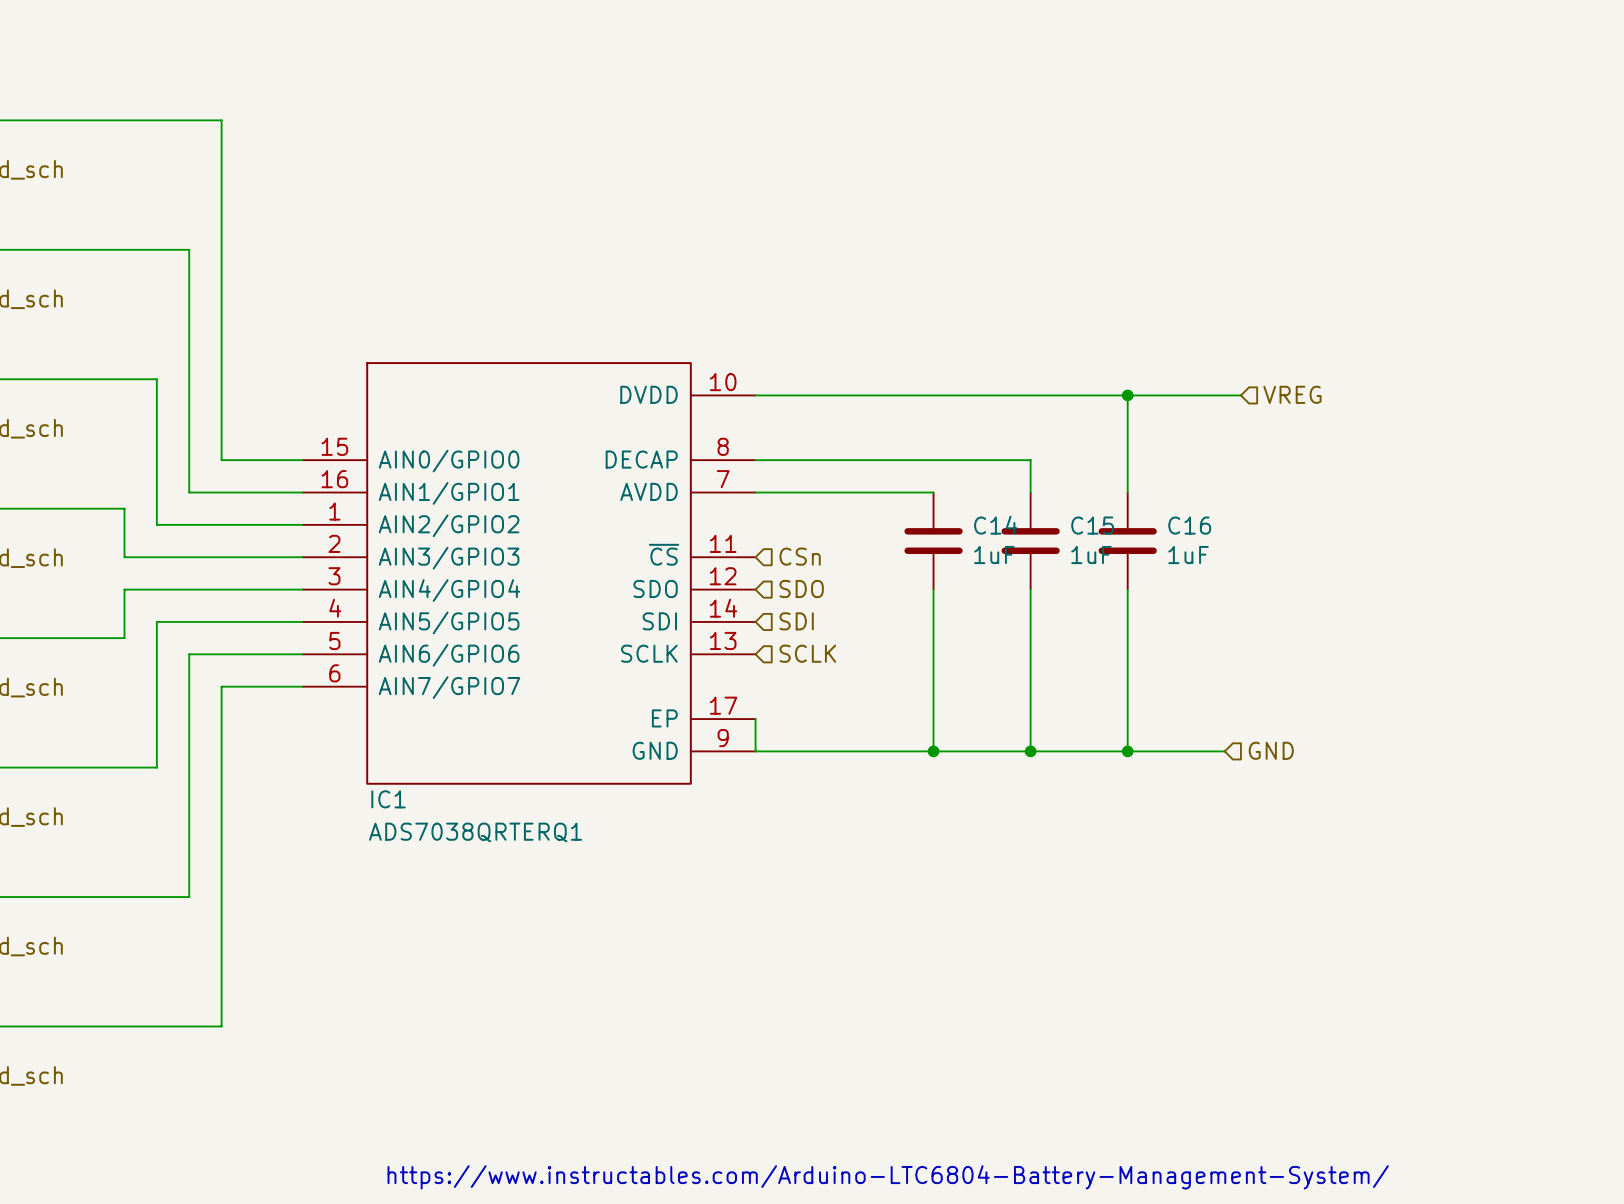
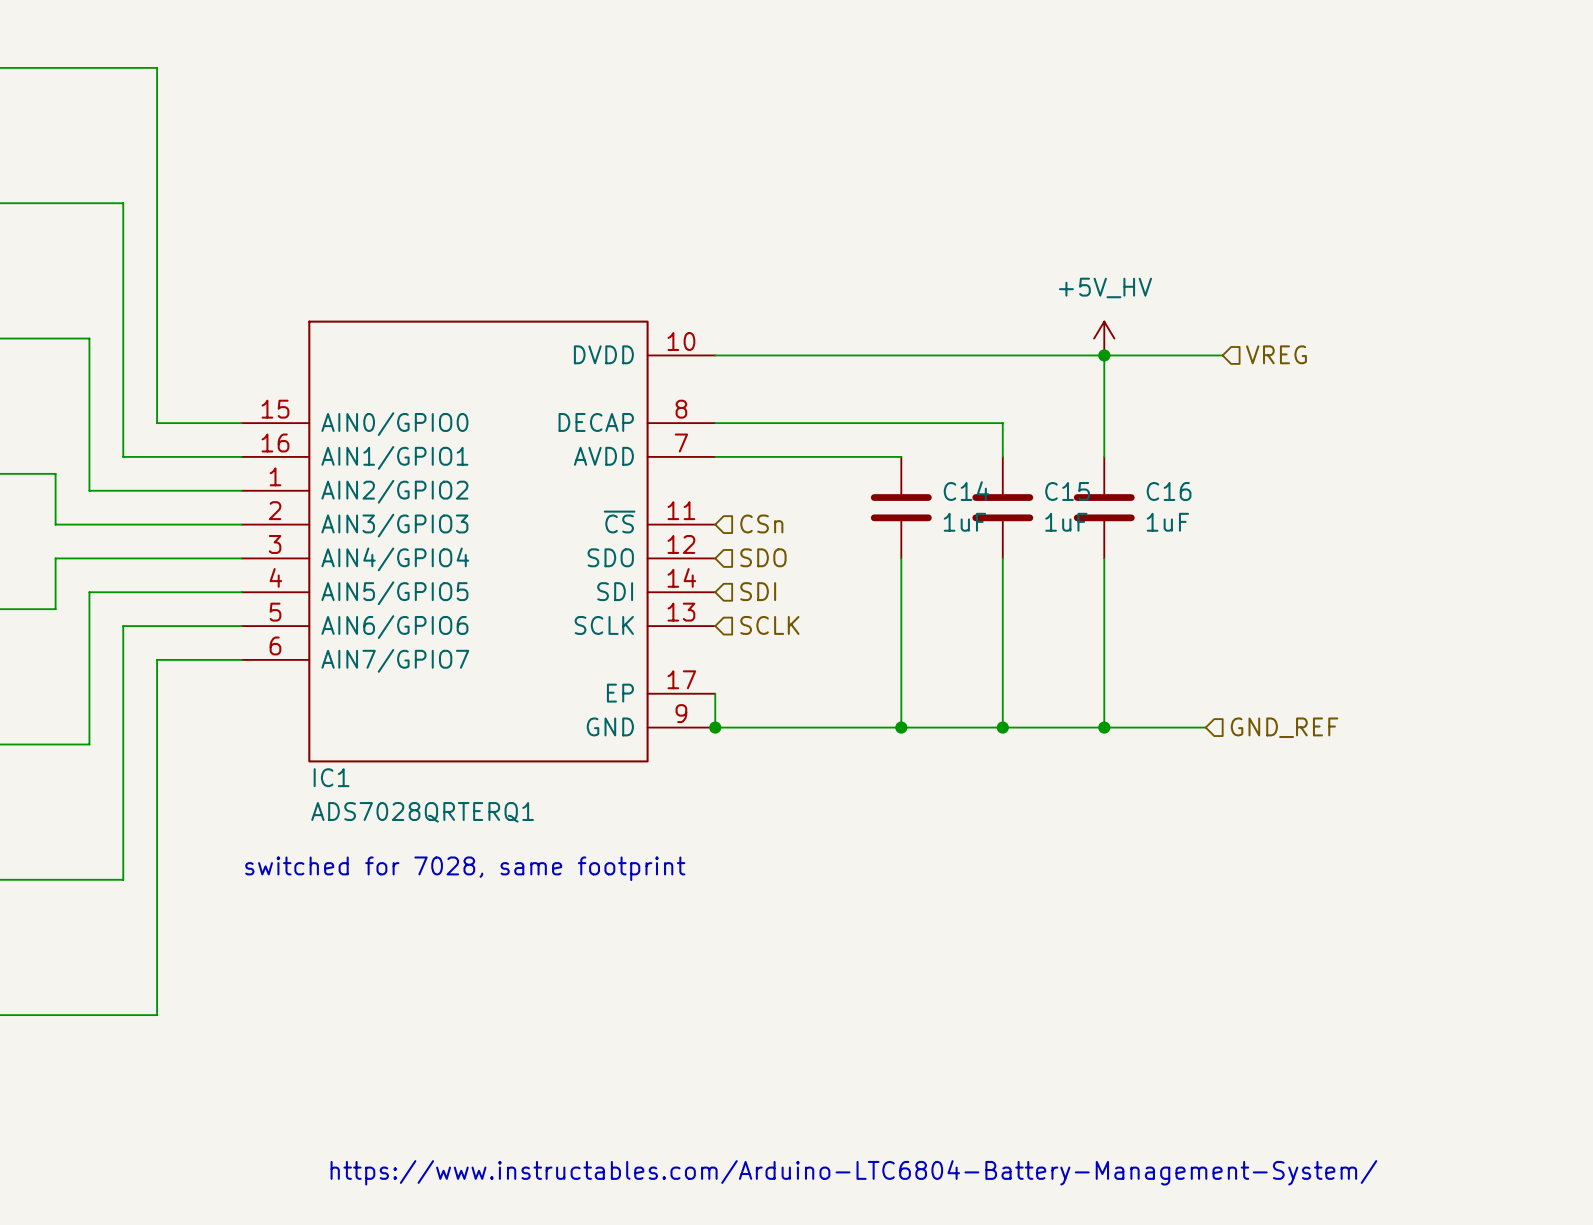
power symbol: none -> +5V_HV (1104, 338)
hierarchical label: GND (1271, 750) -> GND_REF (1284, 727)
junction: none -> (715, 727)
IC1 value: ADS7038QRTERQ1 (475, 832) -> ADS7028QRTERQ1 (422, 812)
text: none -> switched for 7028, same footprint (465, 868)

